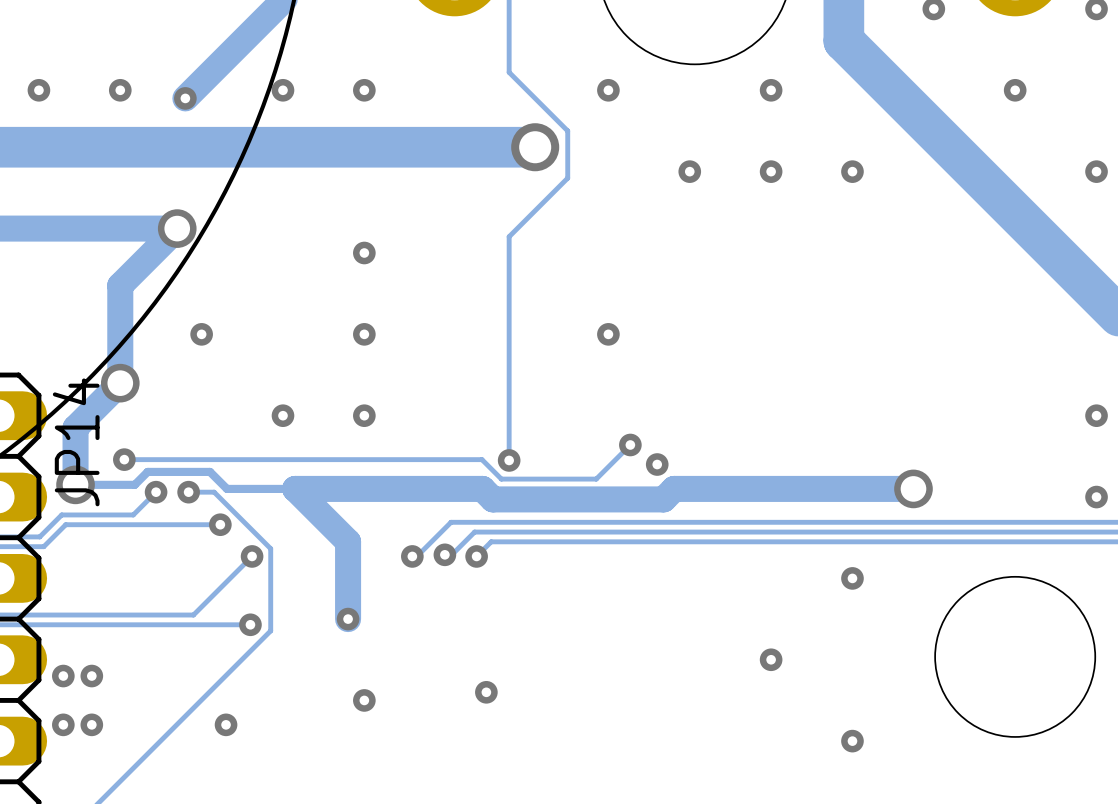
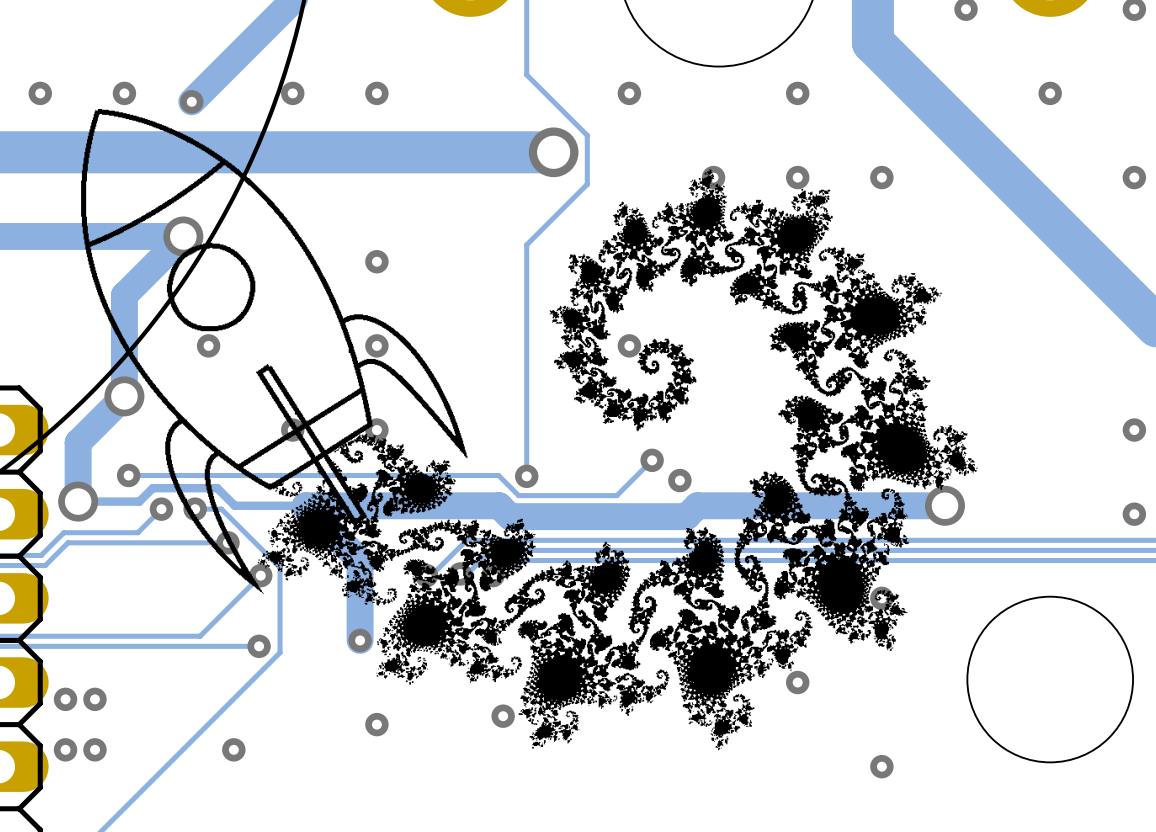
drawing: none -> [81, 108, 978, 751]
drawing: none -> [166, 242, 256, 332]
JP14 name: JP14 (76, 442) -> none

